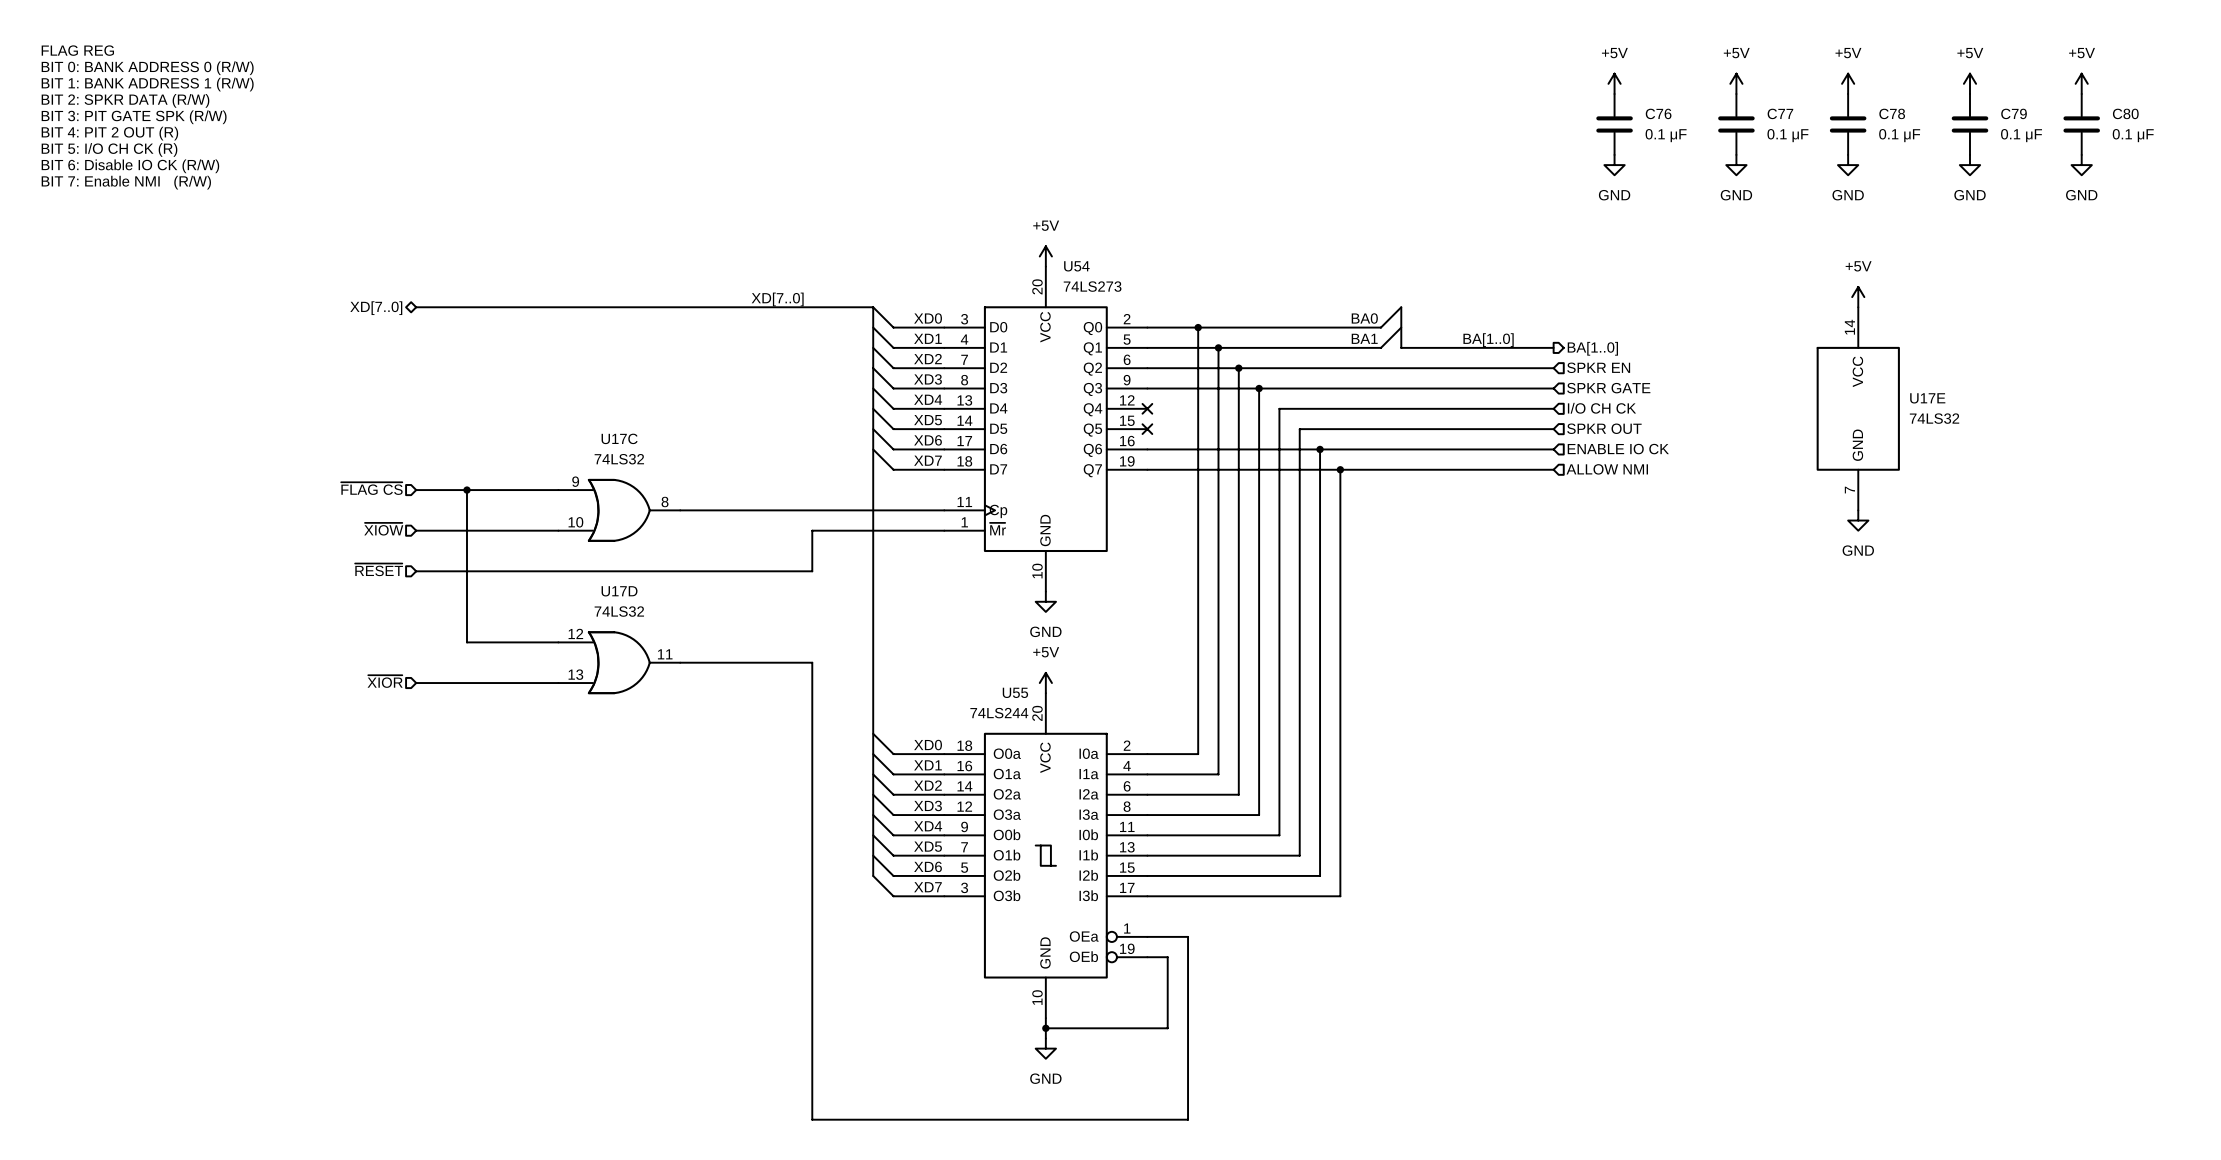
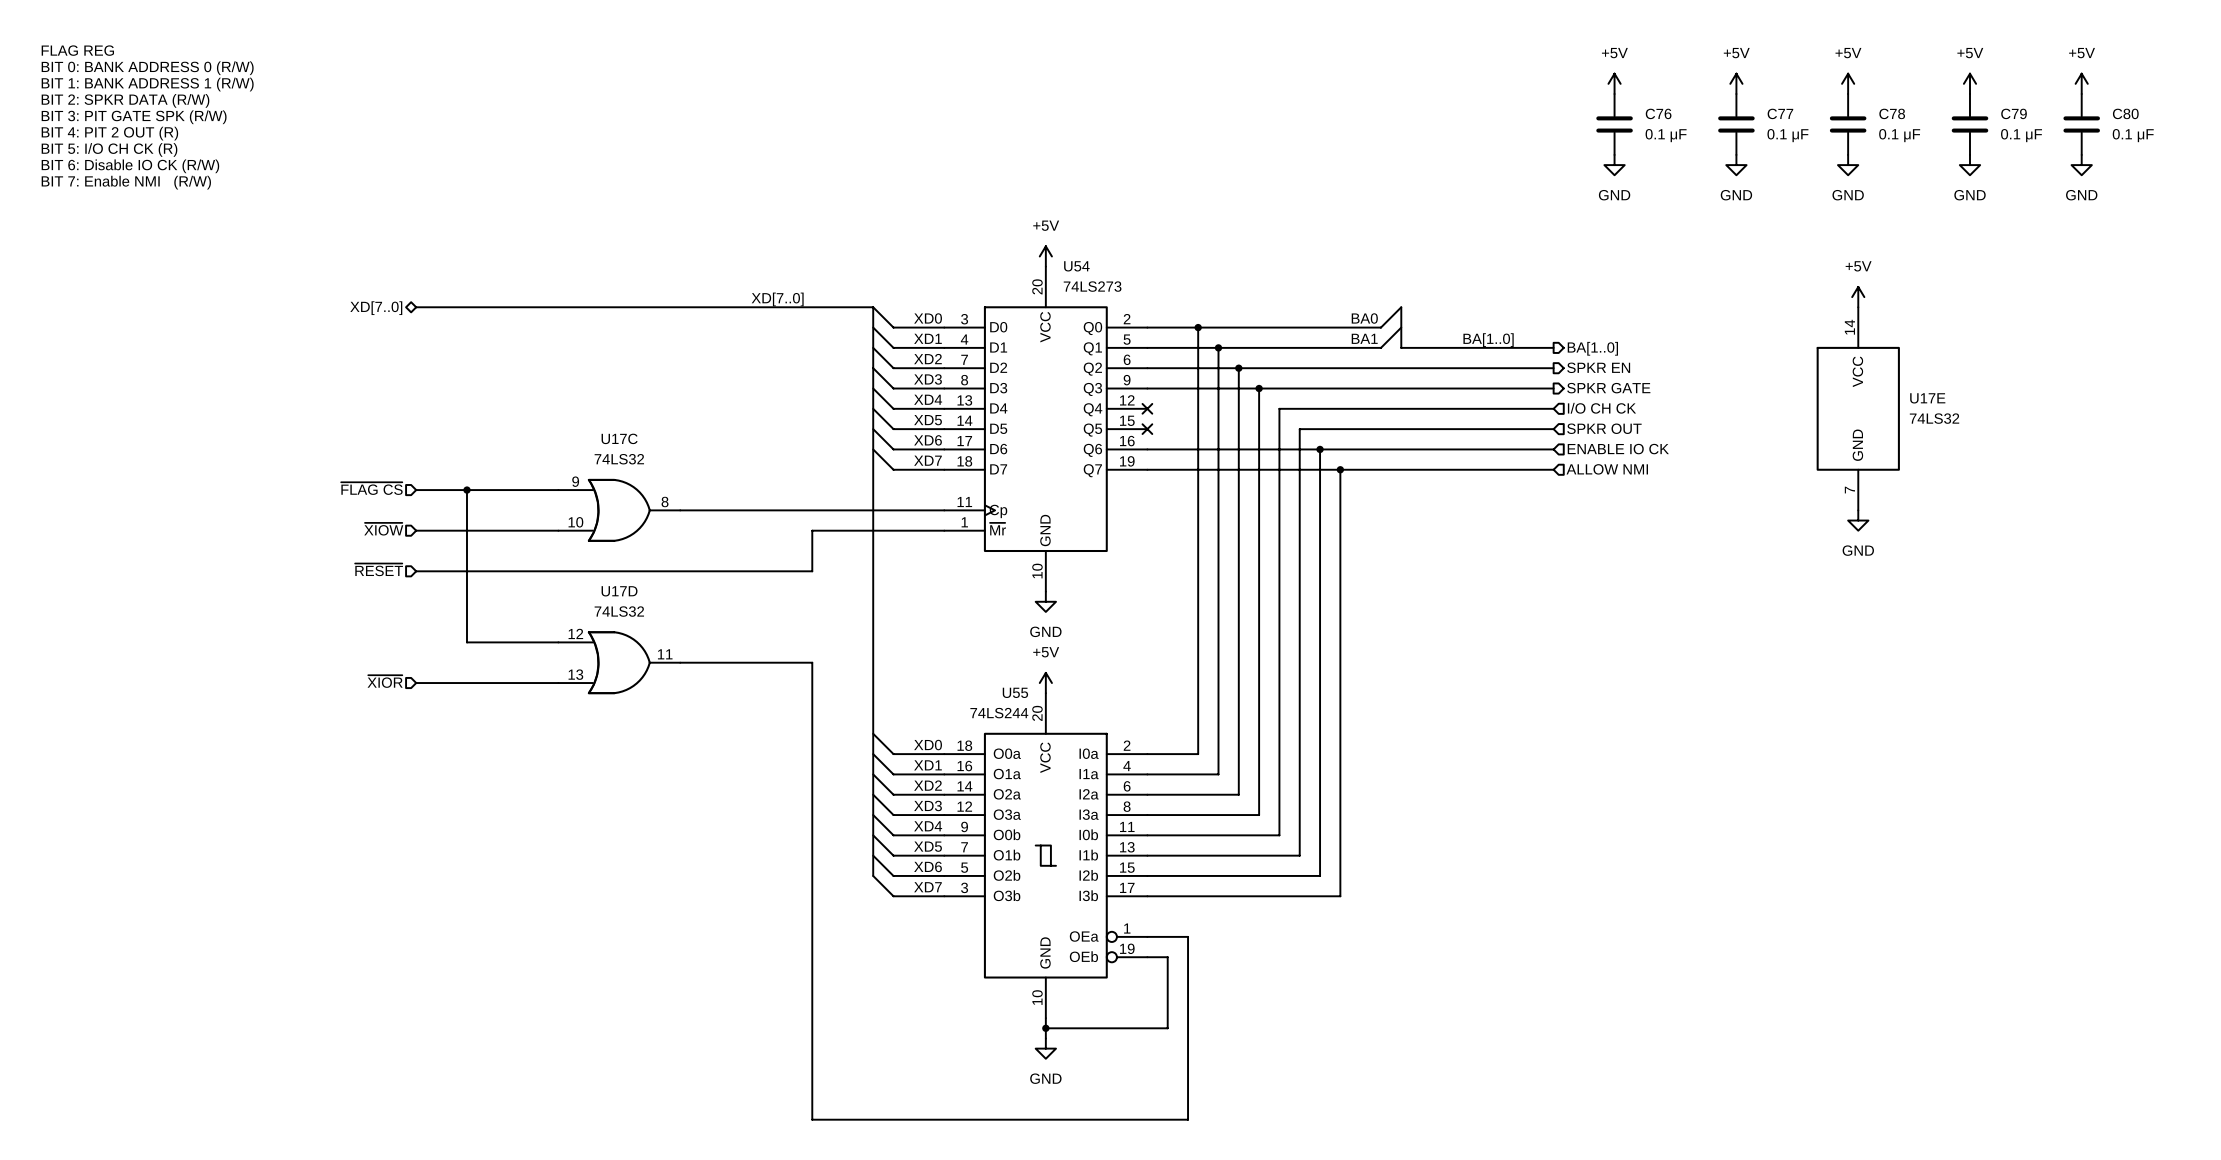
hierarchical label shape: input (1598, 367) -> output (1598, 367)
hierarchical label shape: input (1608, 388) -> output (1608, 388)

